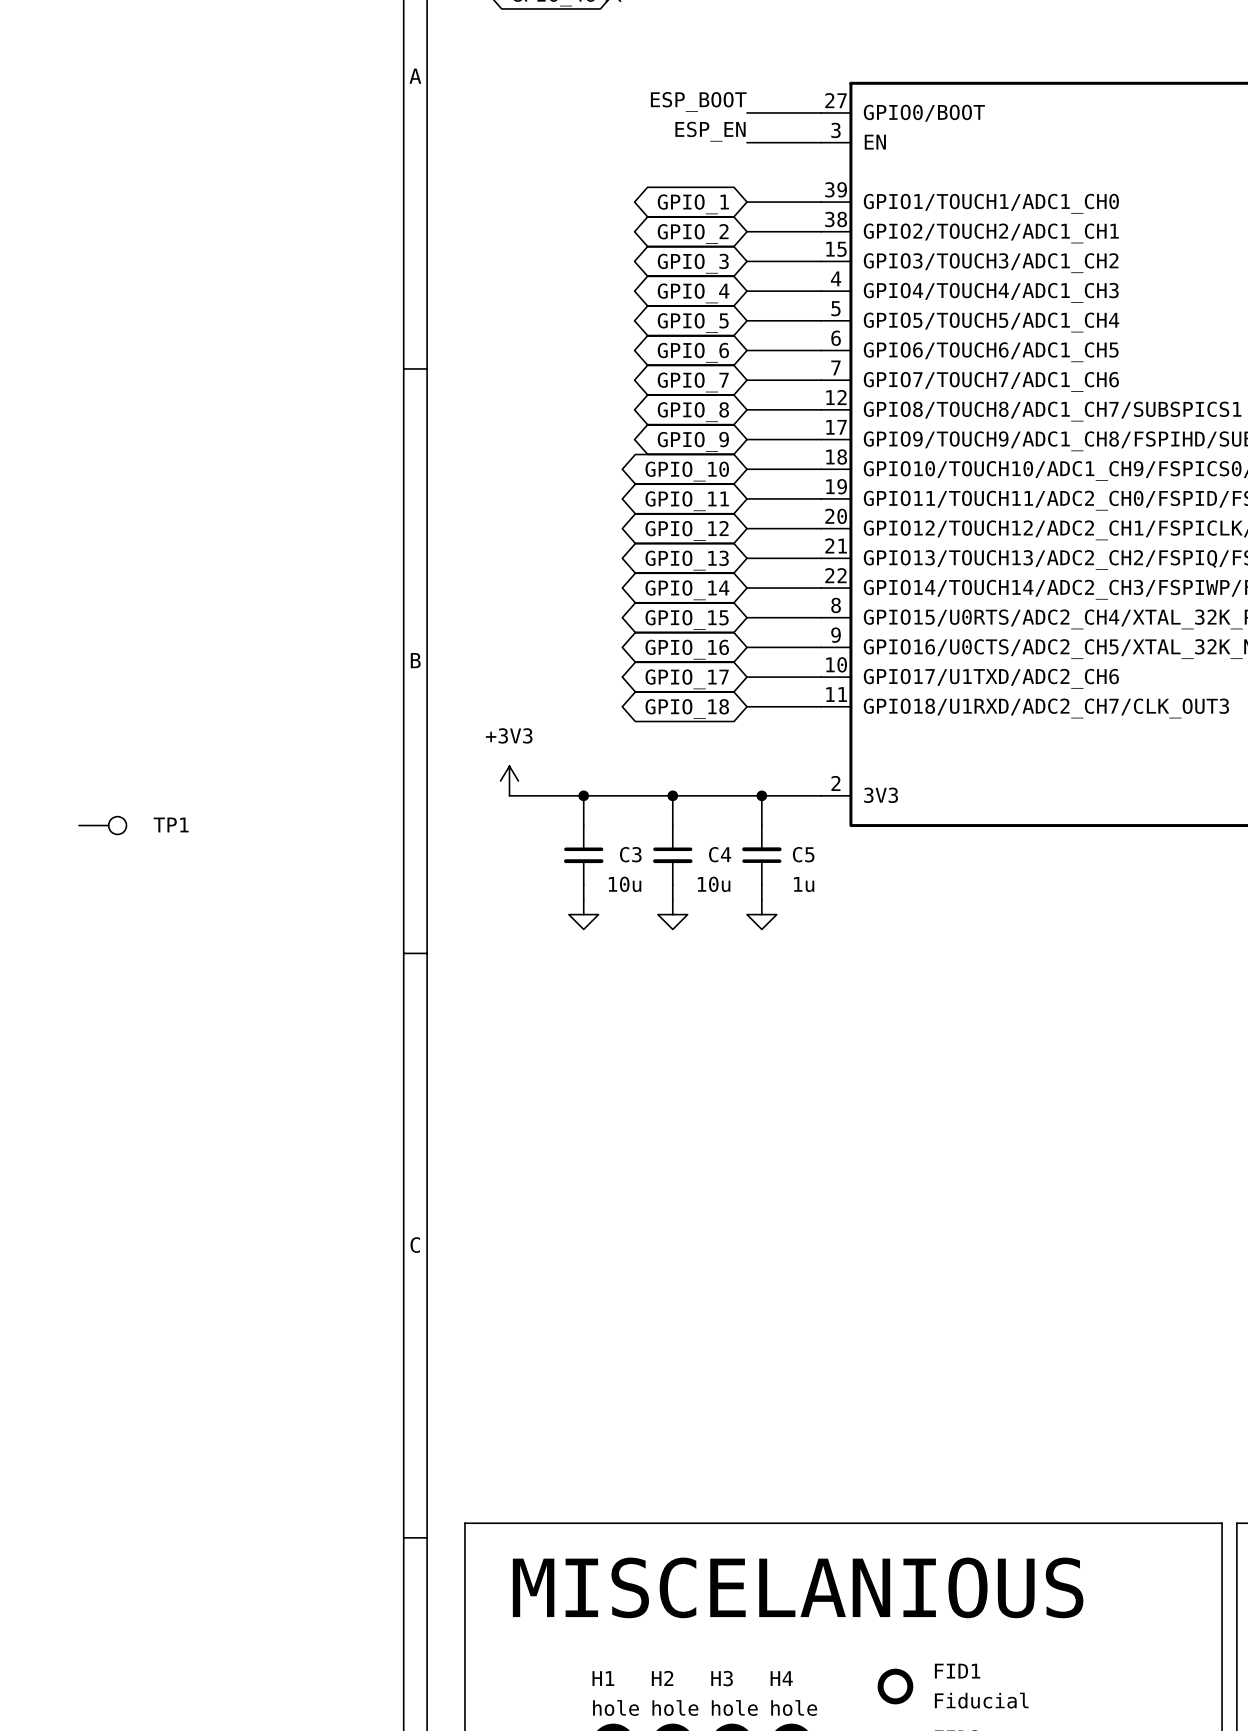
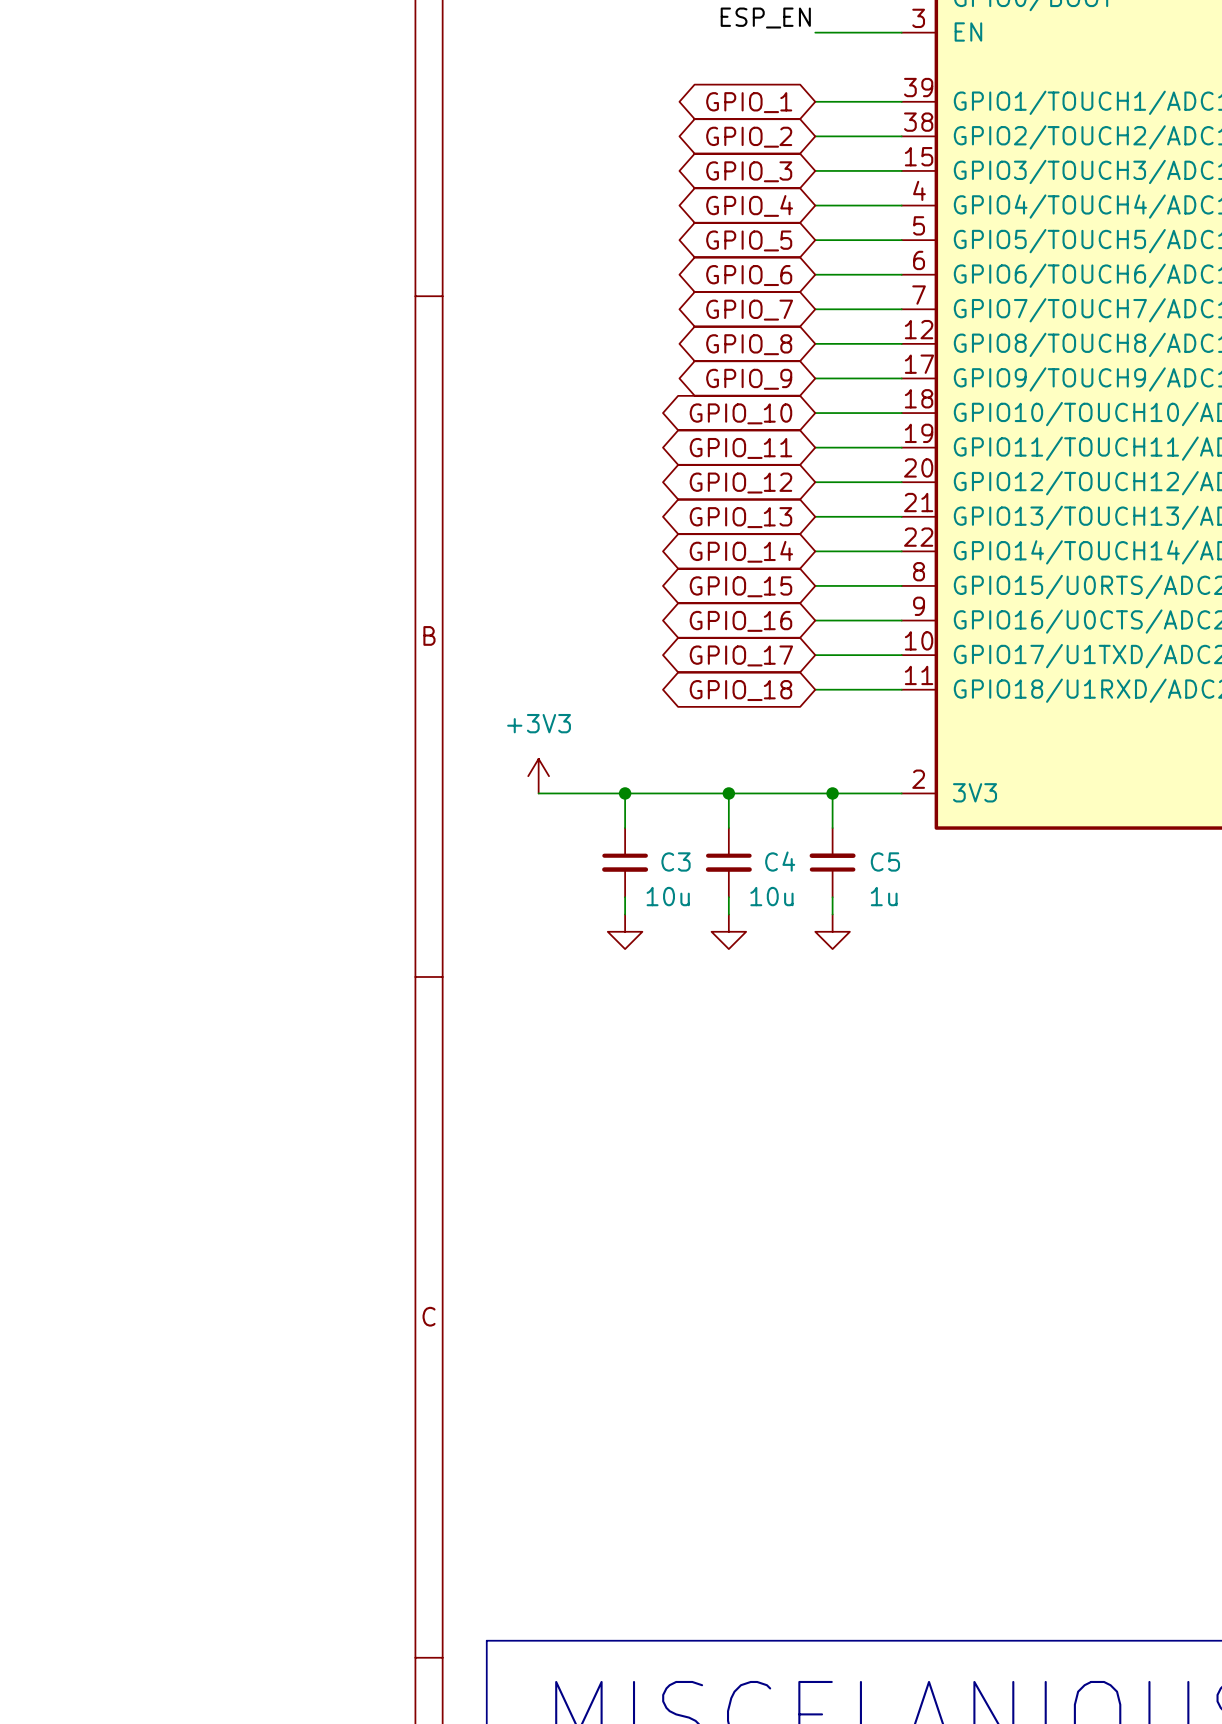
TP1: (102, 825) -> none

